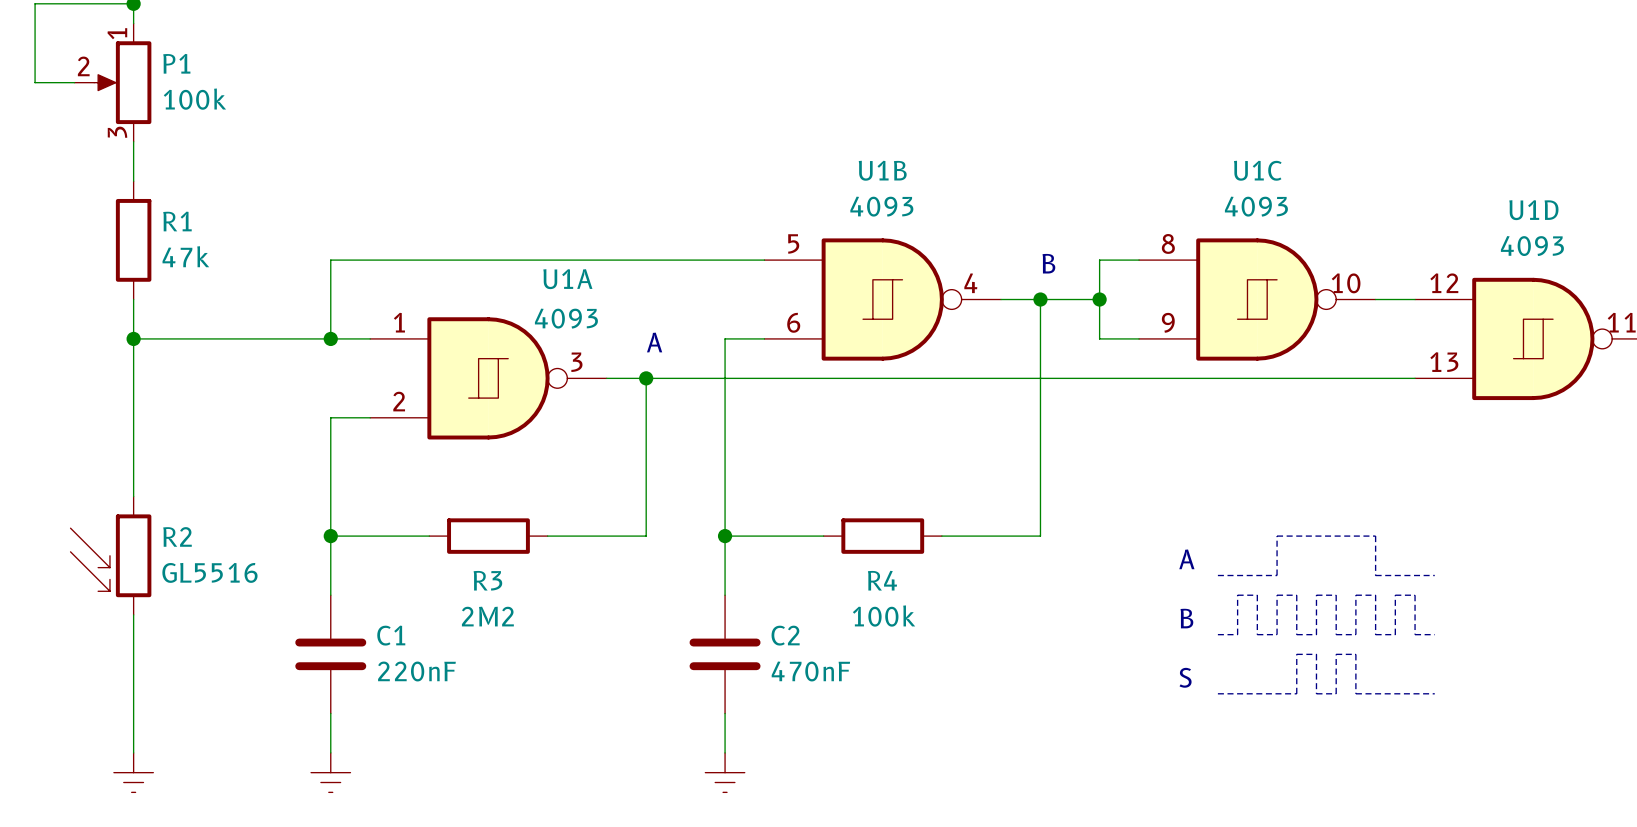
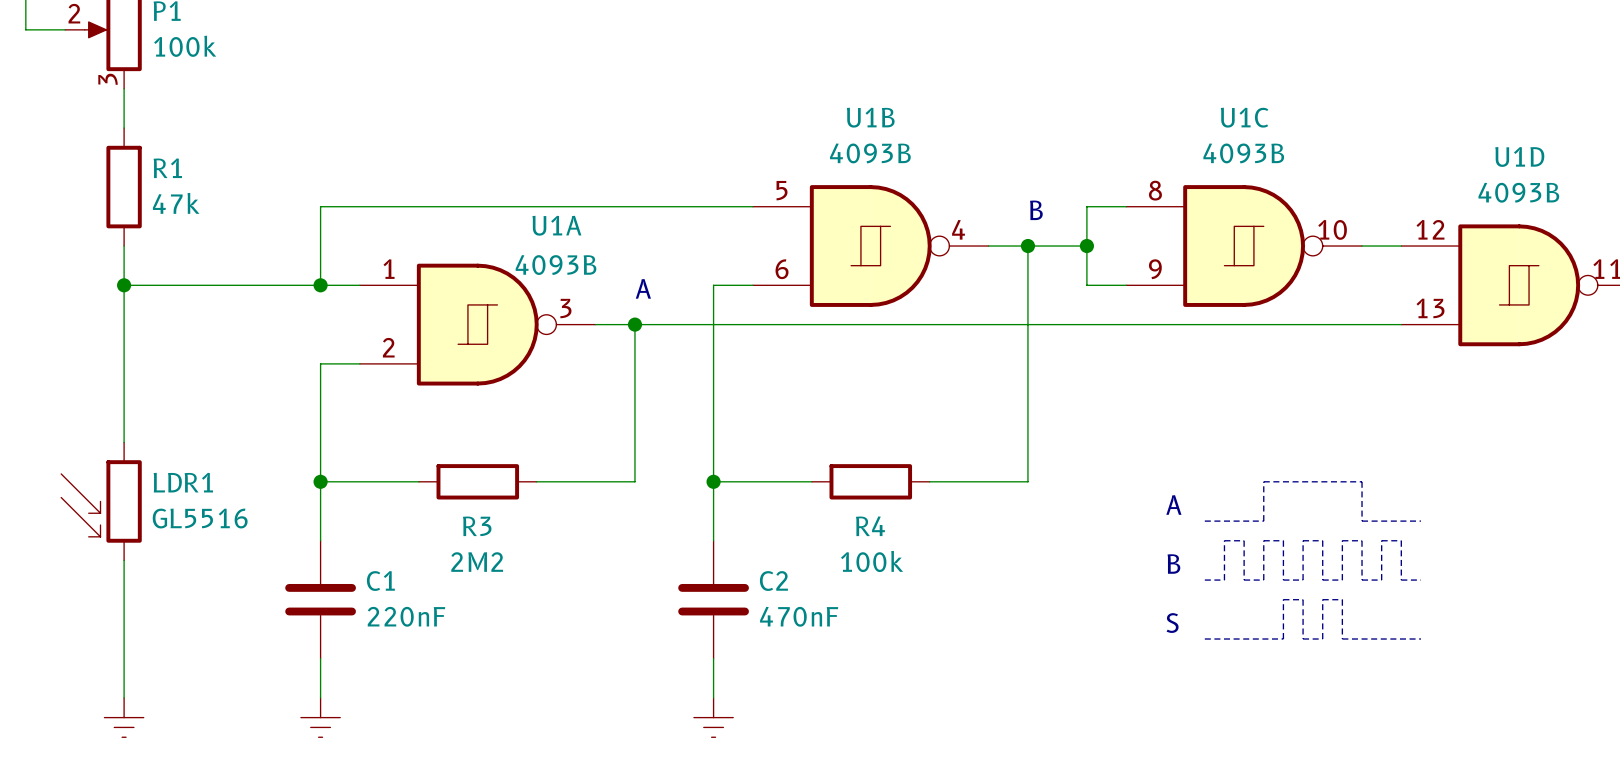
U1B value: 4093 (881, 206) -> 4093B (870, 153)
U1C value: 4093 (1256, 206) -> 4093B (1243, 153)
U1D value: 4093 (1532, 246) -> 4093B (1518, 192)
U1A value: 4093 (566, 318) -> 4093B (556, 265)
R2 name: R2 (177, 536) -> LDR1 (183, 482)

